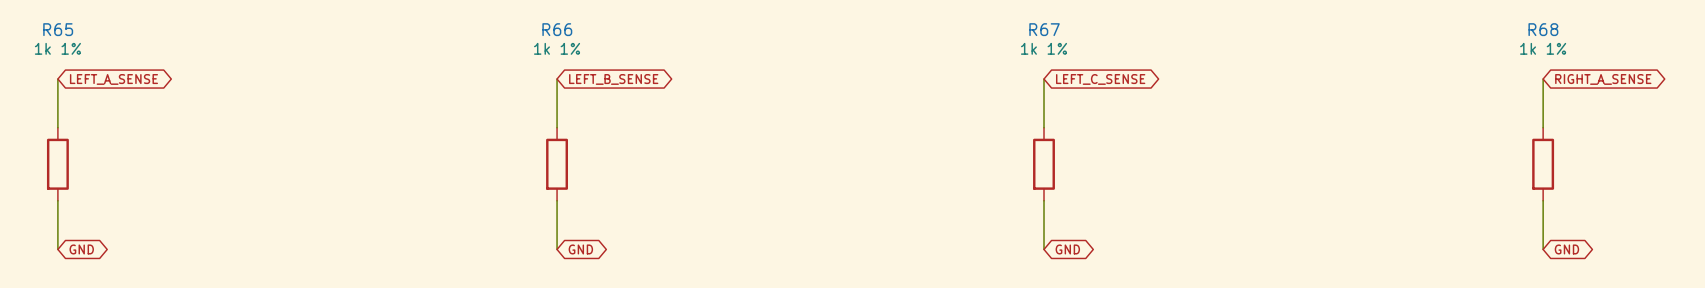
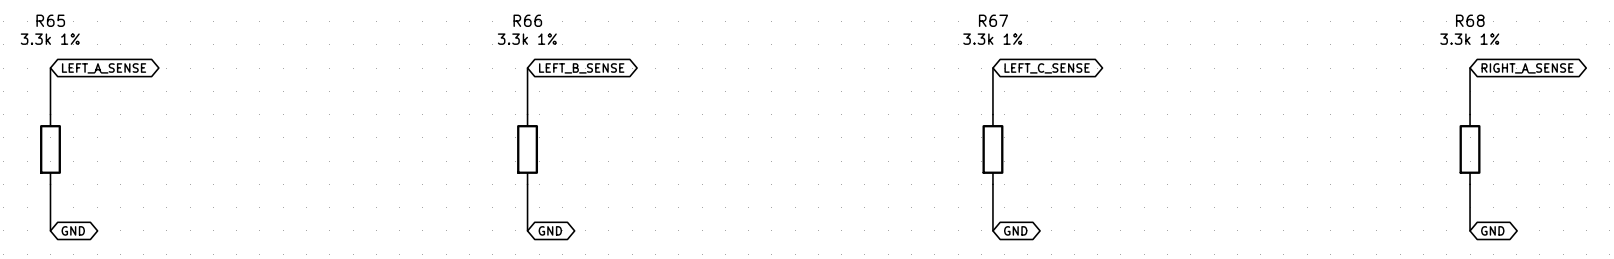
R65 value: 1k 1% (57, 48) -> 3.3k 1% (50, 39)
R66 value: 1k 1% (557, 48) -> 3.3k 1% (527, 39)
R67 value: 1k 1% (1044, 48) -> 3.3k 1% (992, 39)
R68 value: 1k 1% (1543, 48) -> 3.3k 1% (1469, 39)

